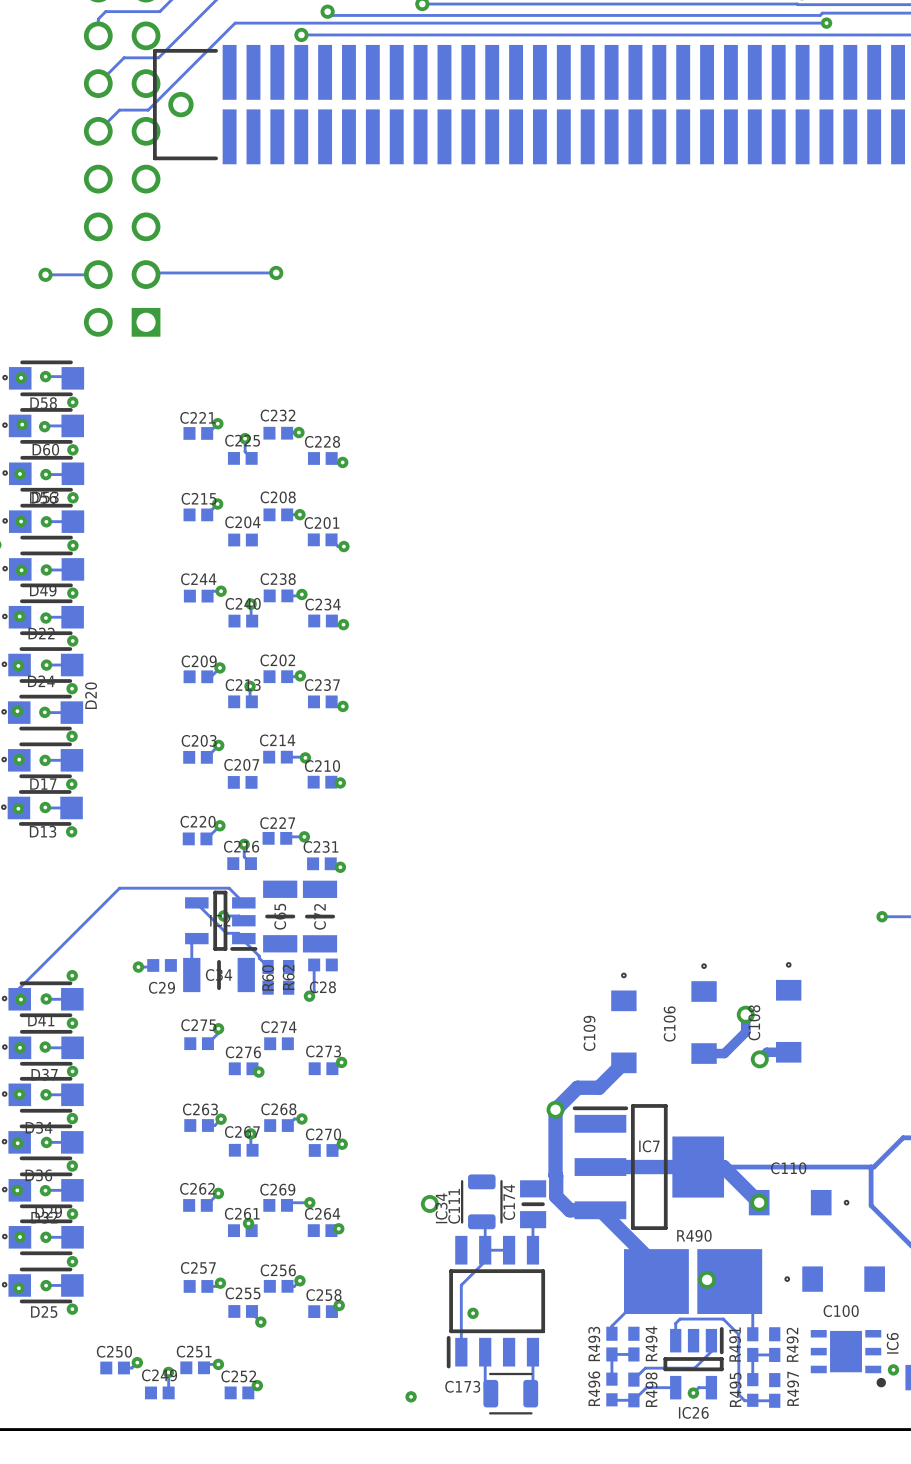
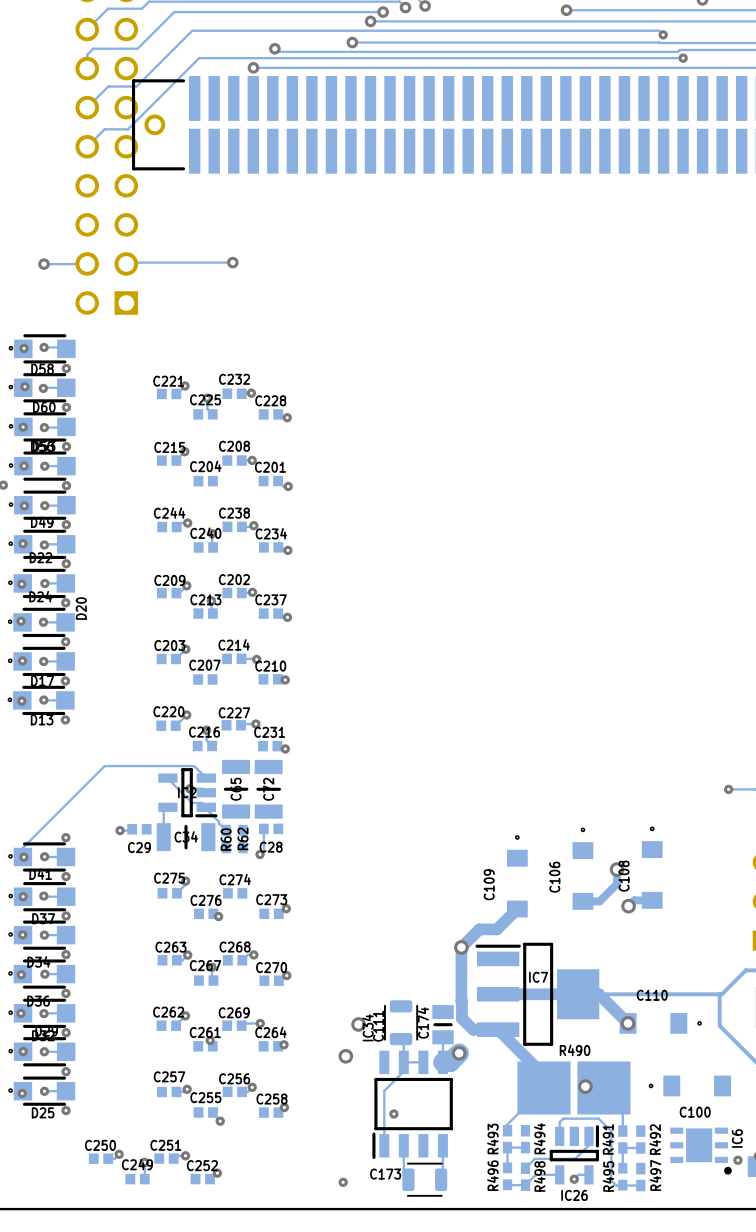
track: none -> (459, 1053) (450, 1062) (442, 1062)
via: none -> (459, 1053)
via: none -> (345, 1056)

